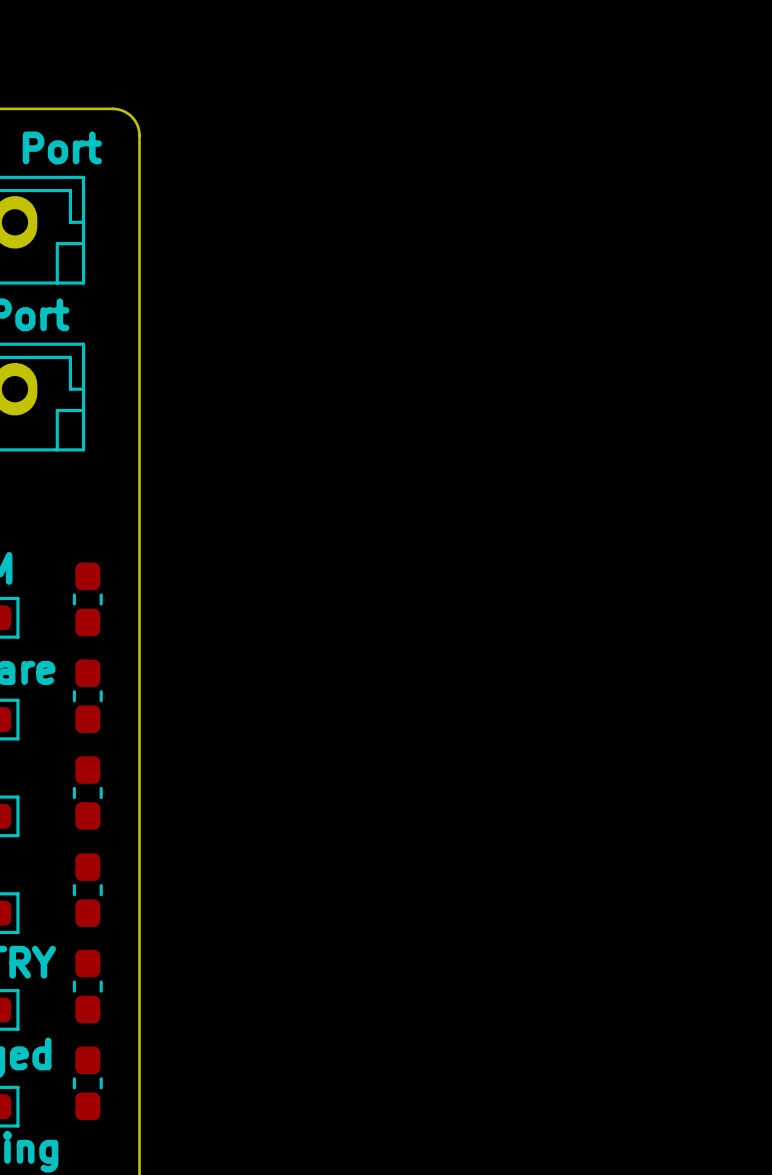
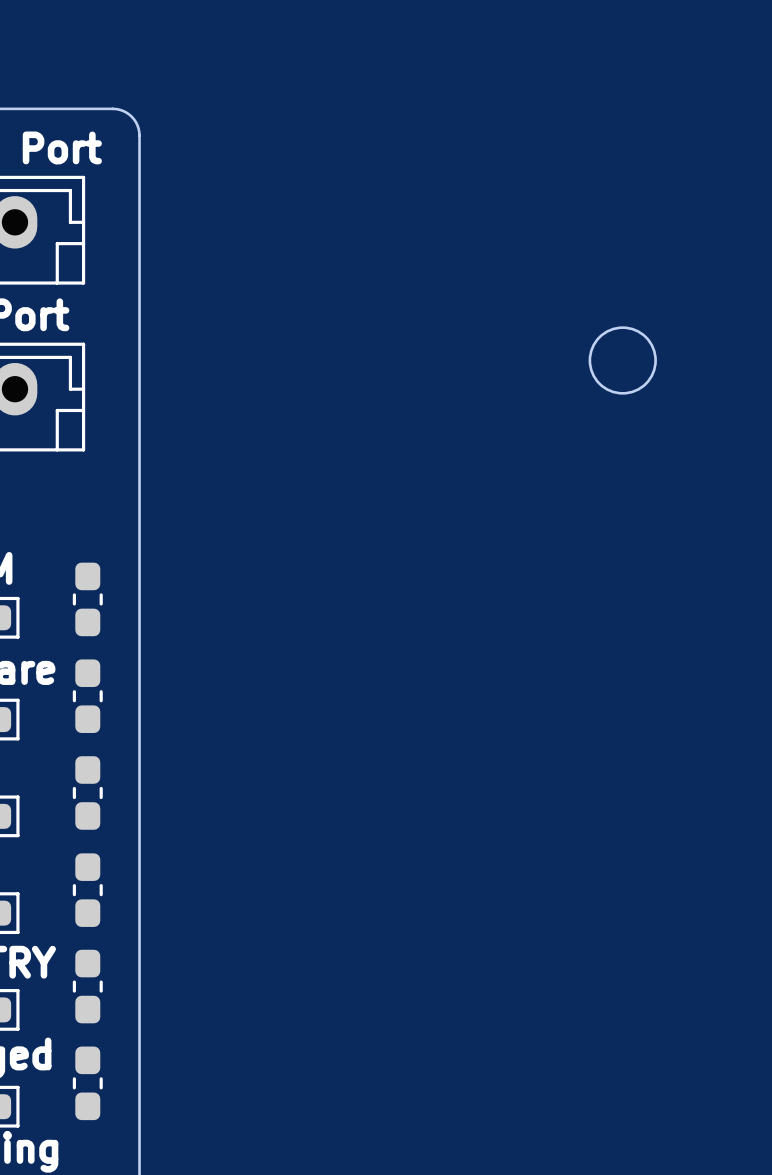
round board edge: none -> [588, 326, 657, 395]

